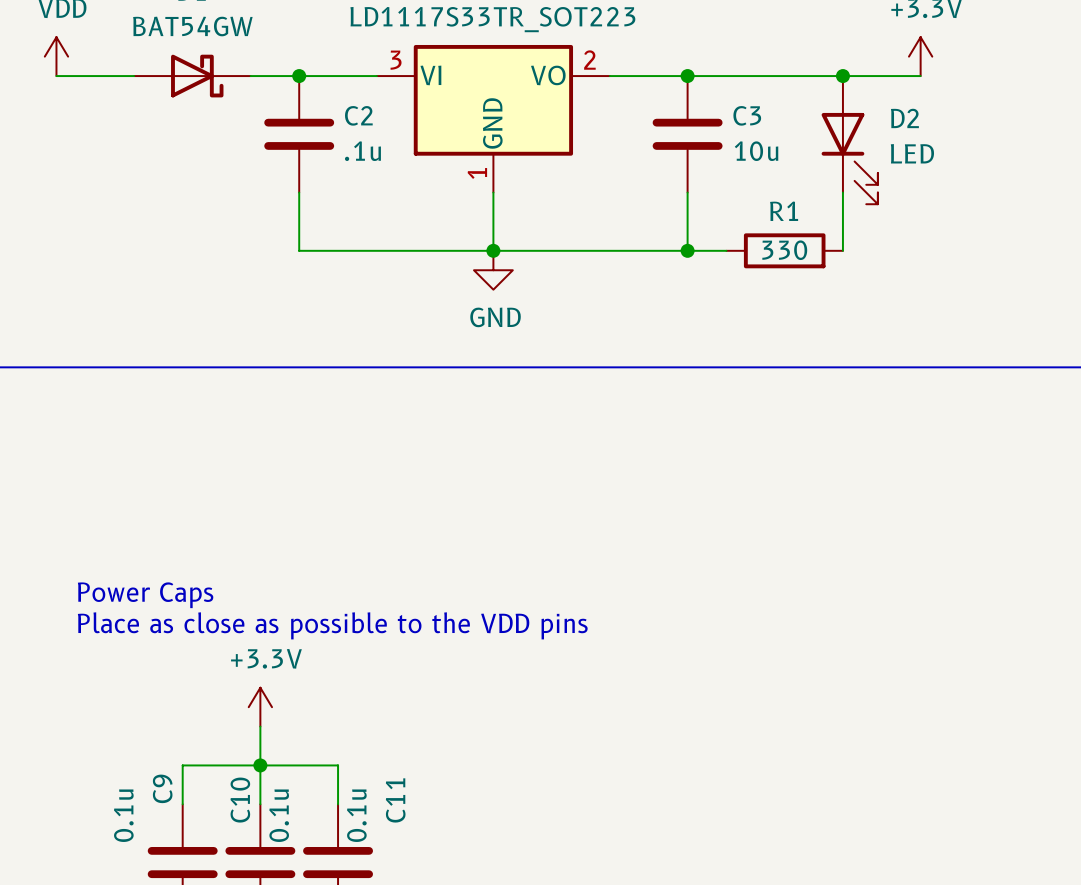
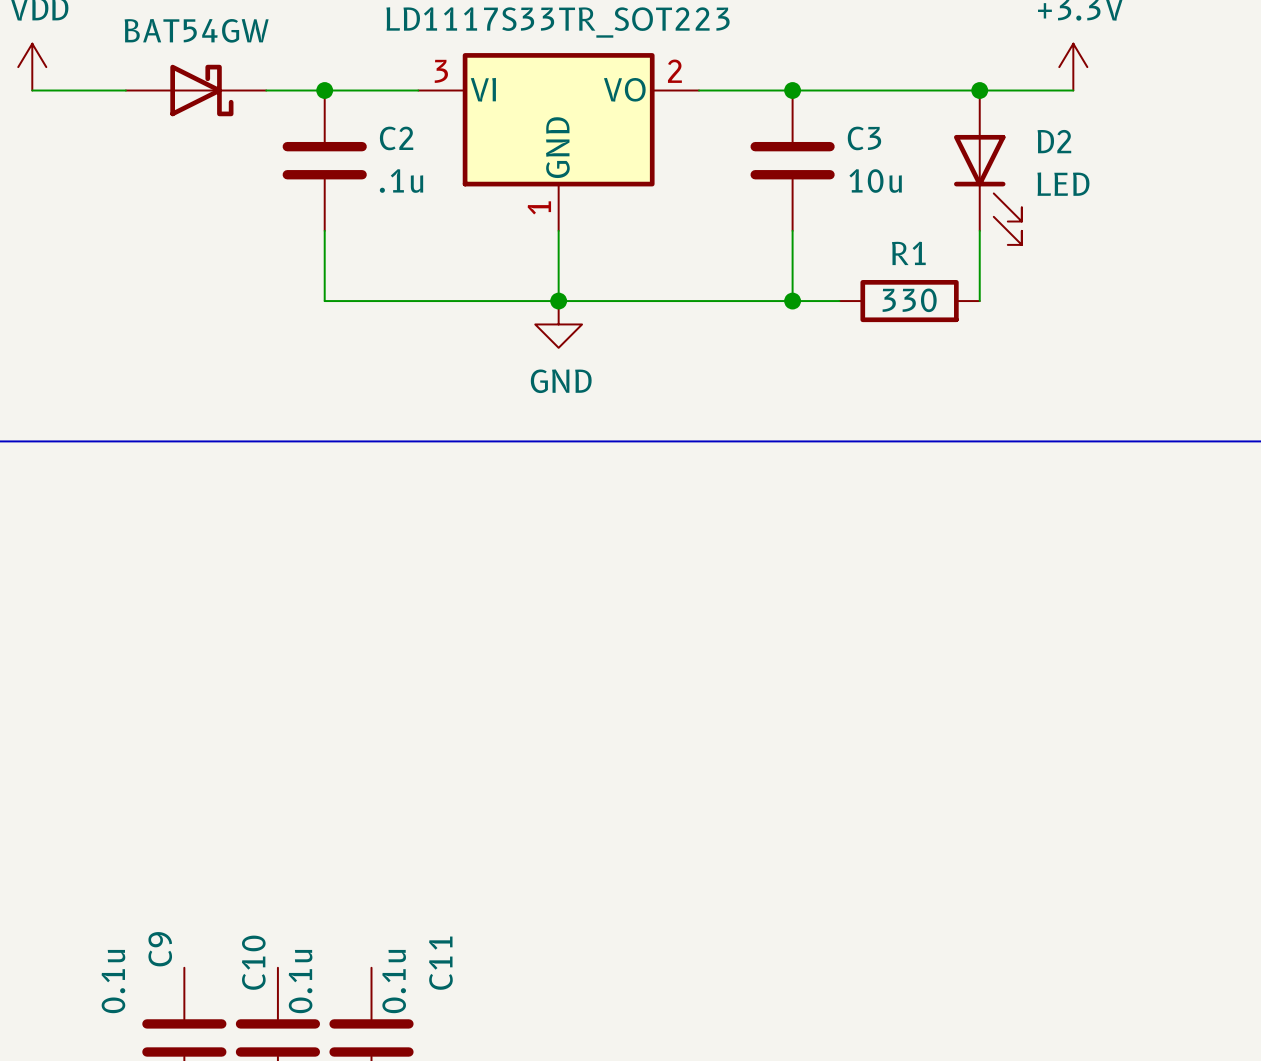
text: Power Caps (145, 595) -> none
text: Place as close as possible to the VDD pins (332, 625) -> none
power symbol: +3.3V (260, 707) -> none
wire: (260, 726) (260, 804) -> none
junction: (260, 765) -> none
wire: (182, 804) (182, 765) (338, 765) (338, 804) -> none

